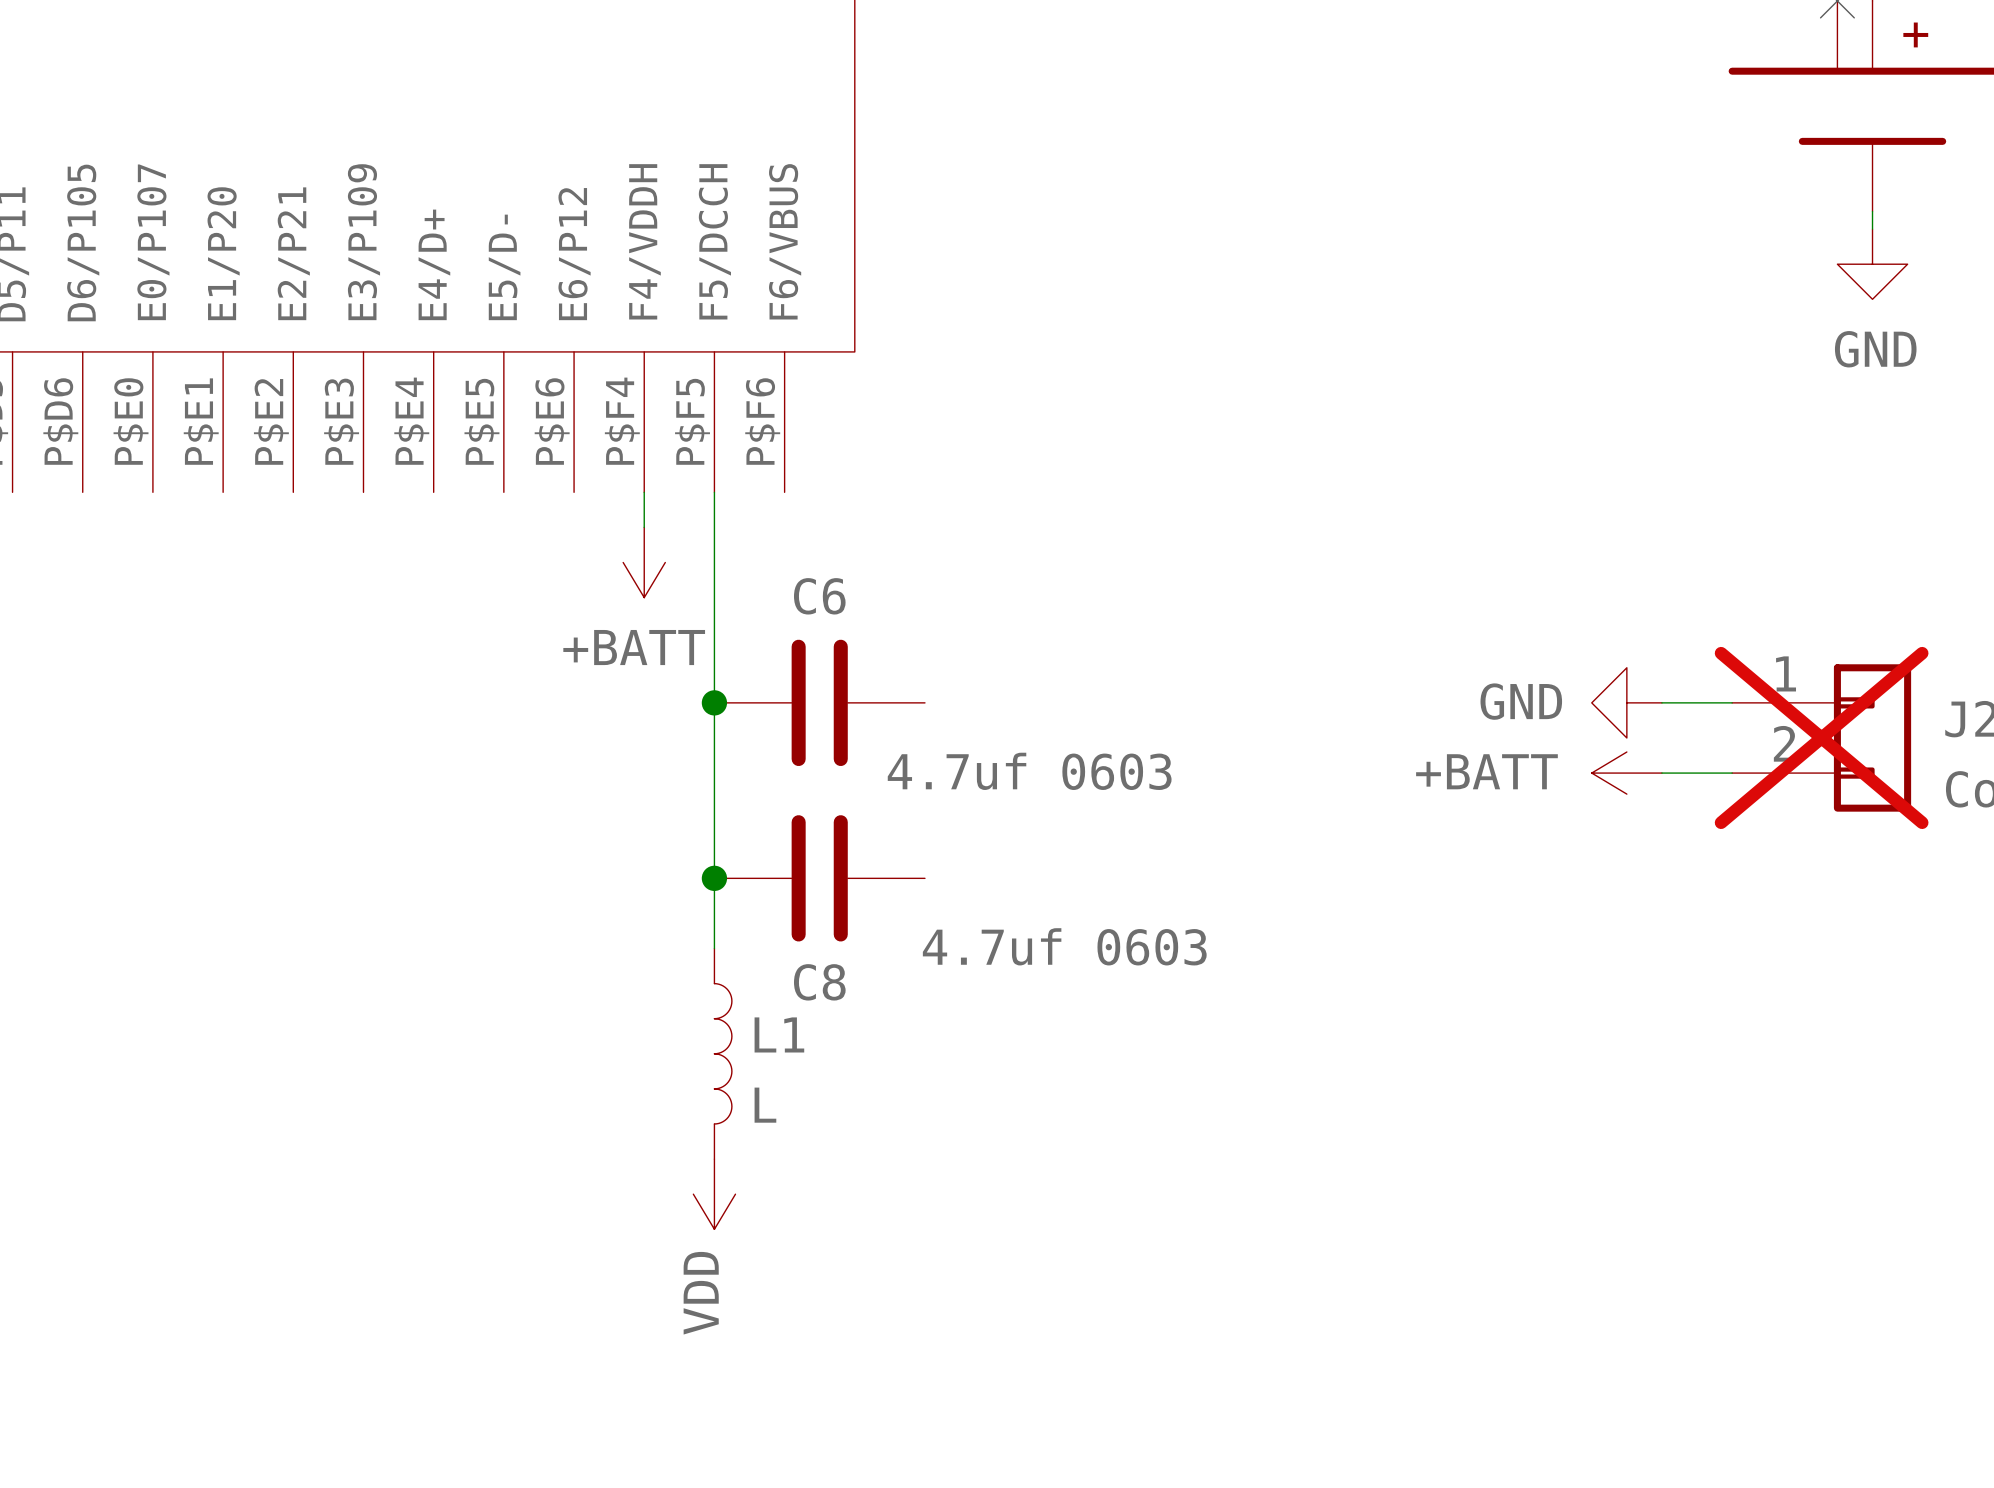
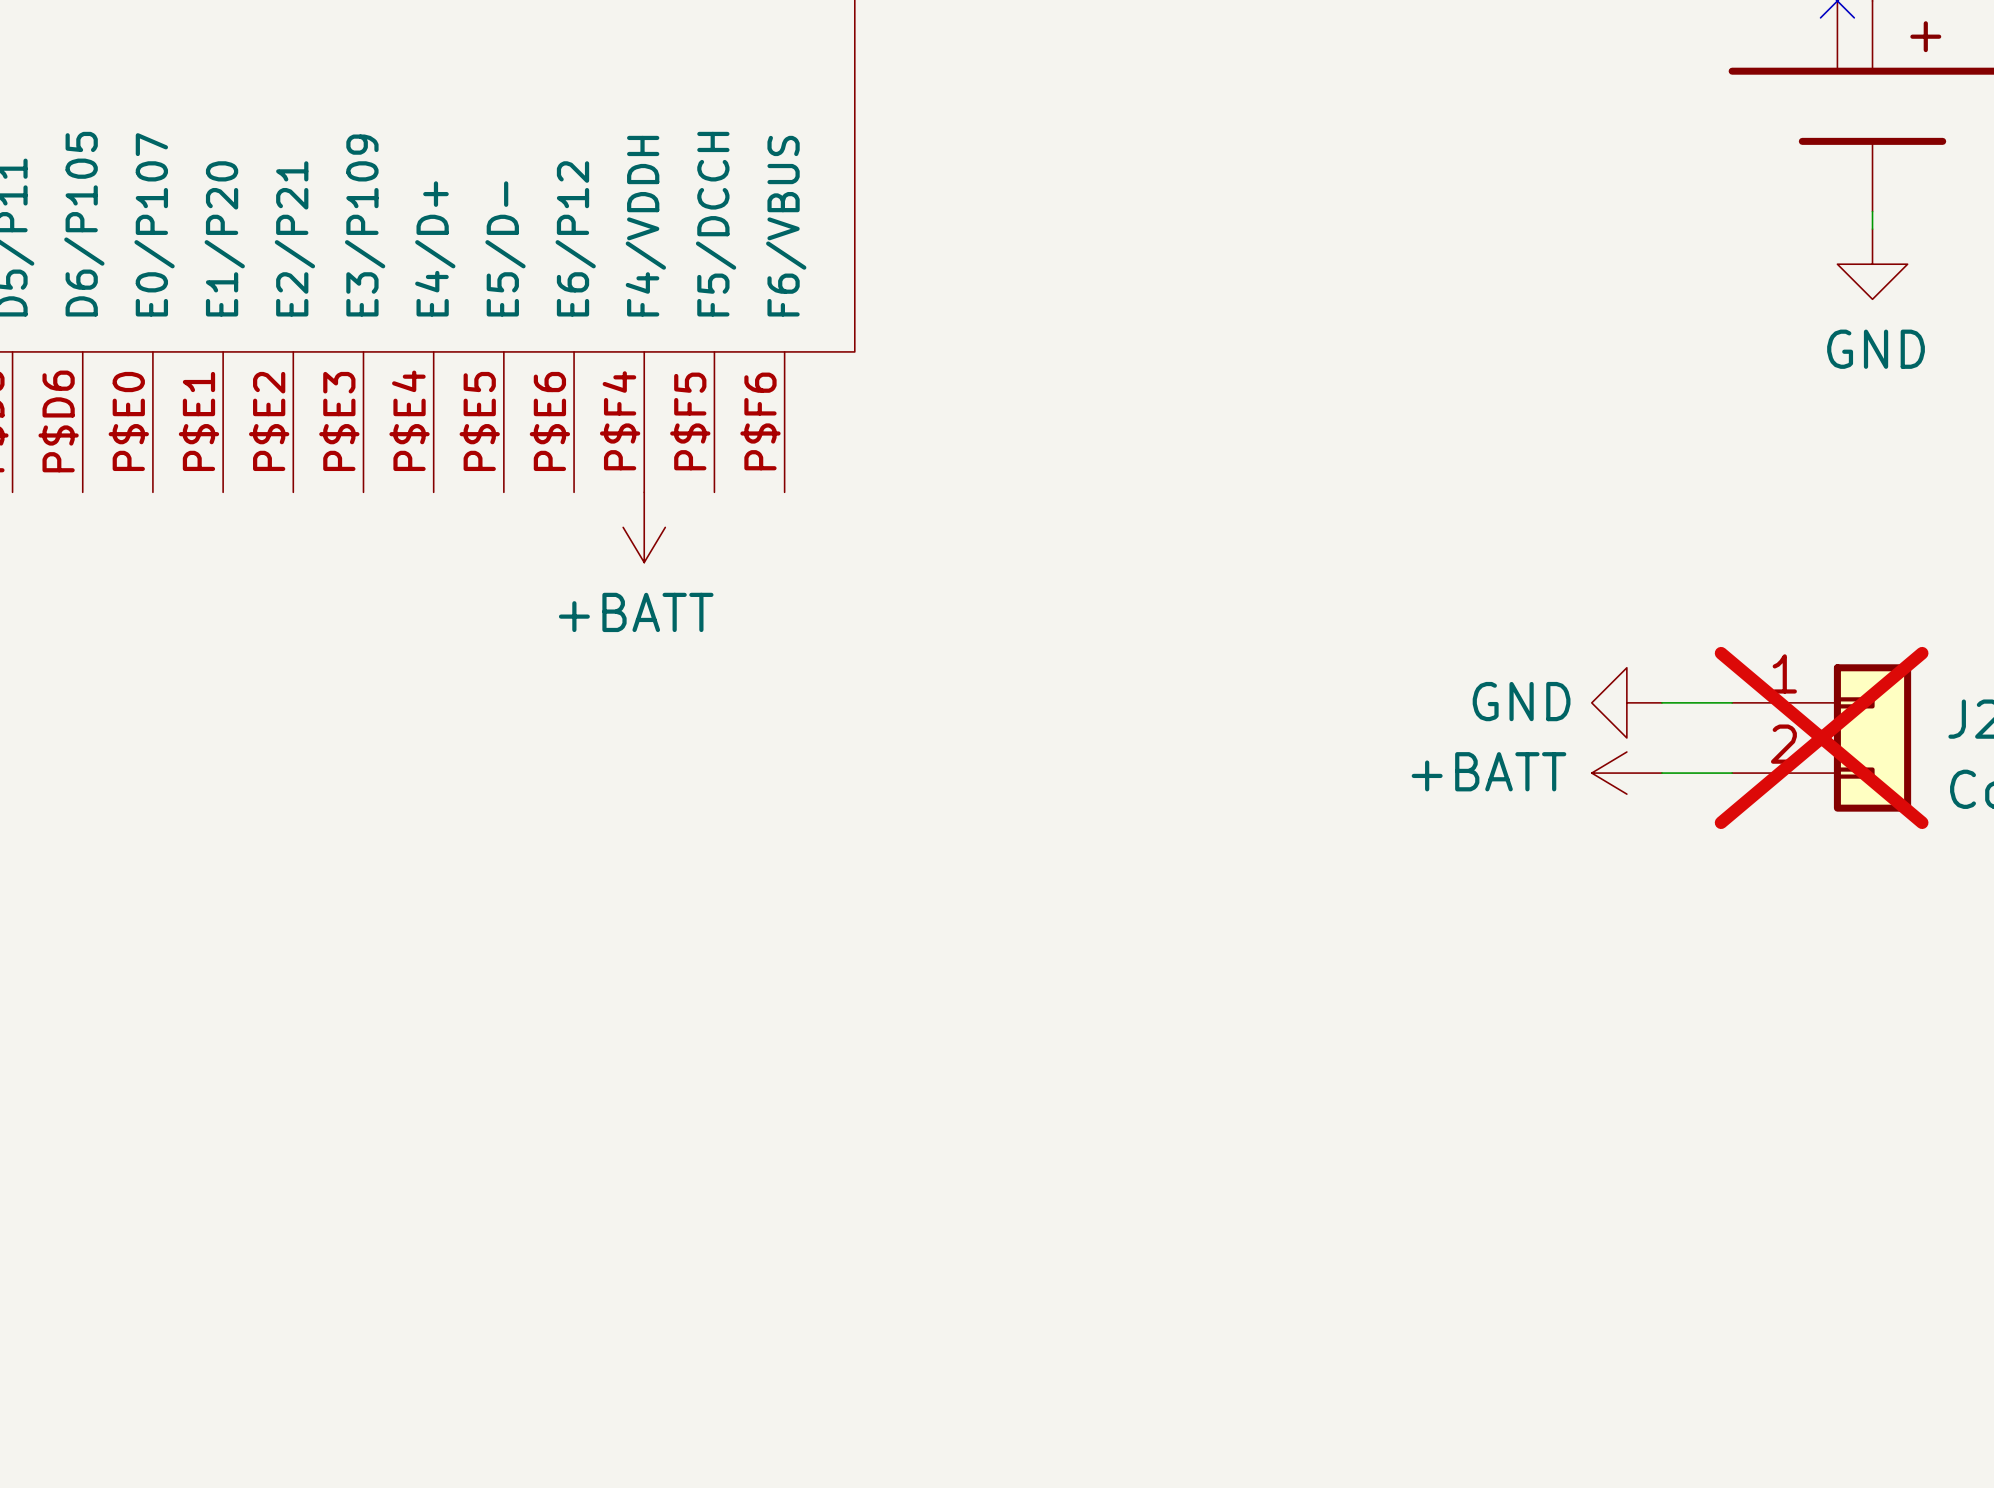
wire: (714, 492) (714, 948) -> none
power symbol position: +BATT (644, 562) -> +BATT (644, 527)
junction: (714, 702) -> none
C6: 4.7uf 0603 (819, 702) -> none
junction: (714, 878) -> none
C8: 4.7uf 0603 (819, 878) -> none
L1: L (723, 1053) -> none
power symbol: VDD (714, 1194) -> none

